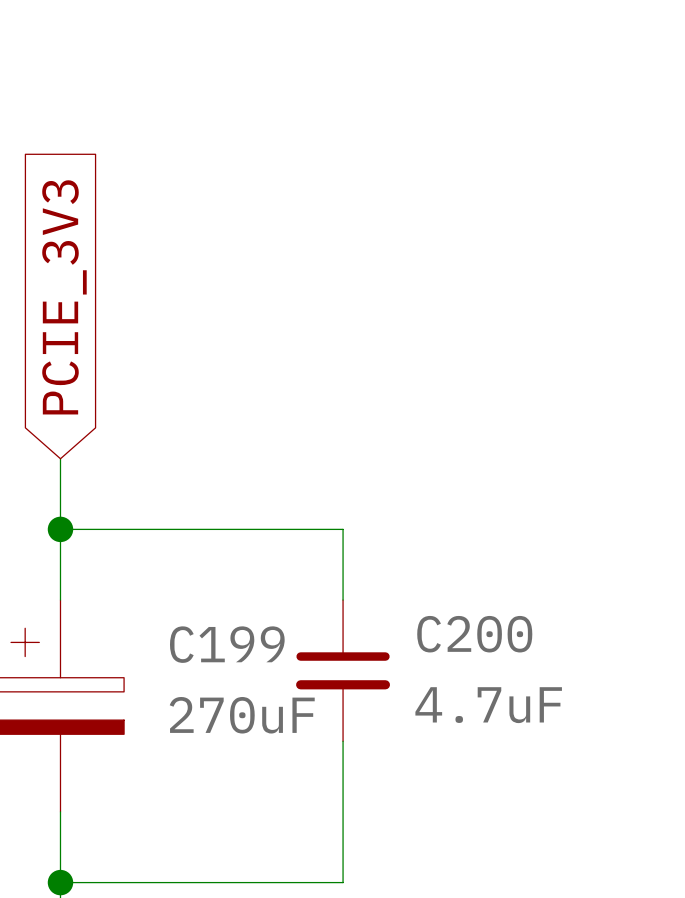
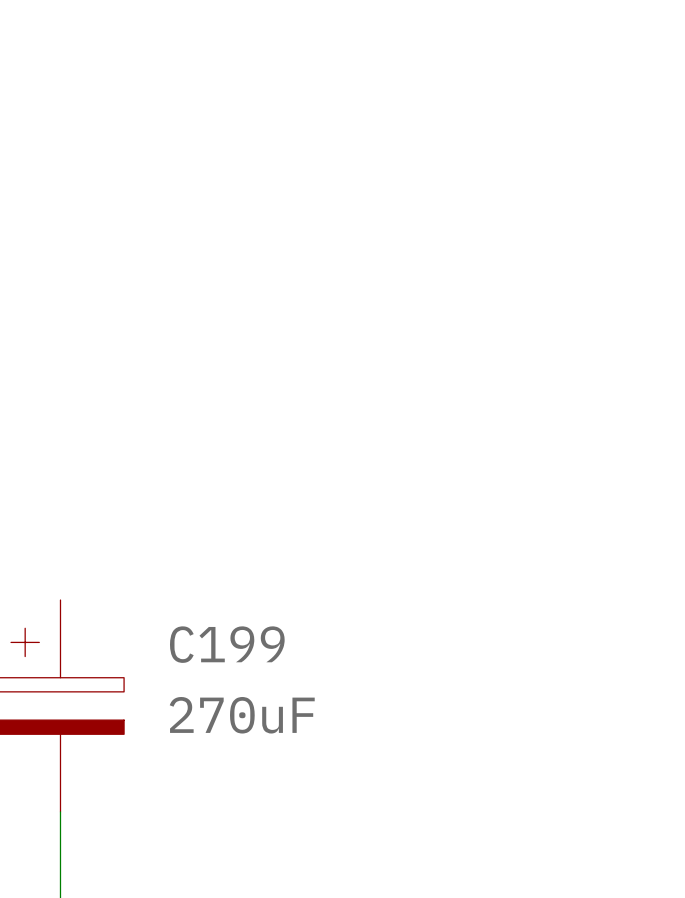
global label: PCIE_3V3 (64, 297) -> none
wire: (60, 458) (60, 600) -> none
wire: (60, 529) (343, 529) (343, 600) -> none
junction: (60, 529) -> none
C200: 4.7uF (343, 670) -> none
wire: (343, 741) (343, 882) (60, 882) -> none
junction: (60, 882) -> none

